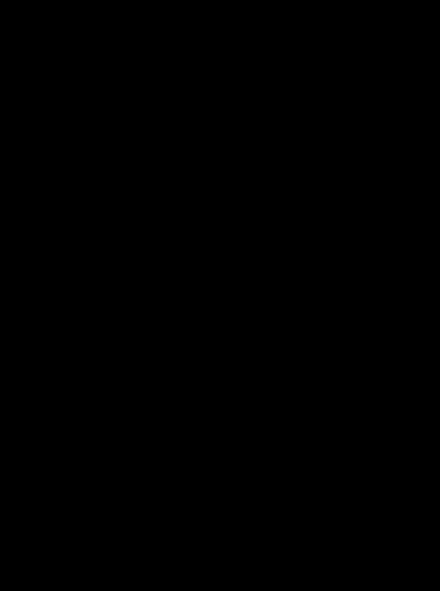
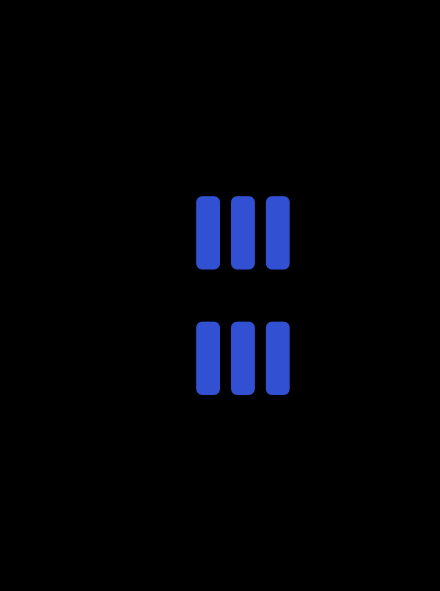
part: none -> (242, 295)

